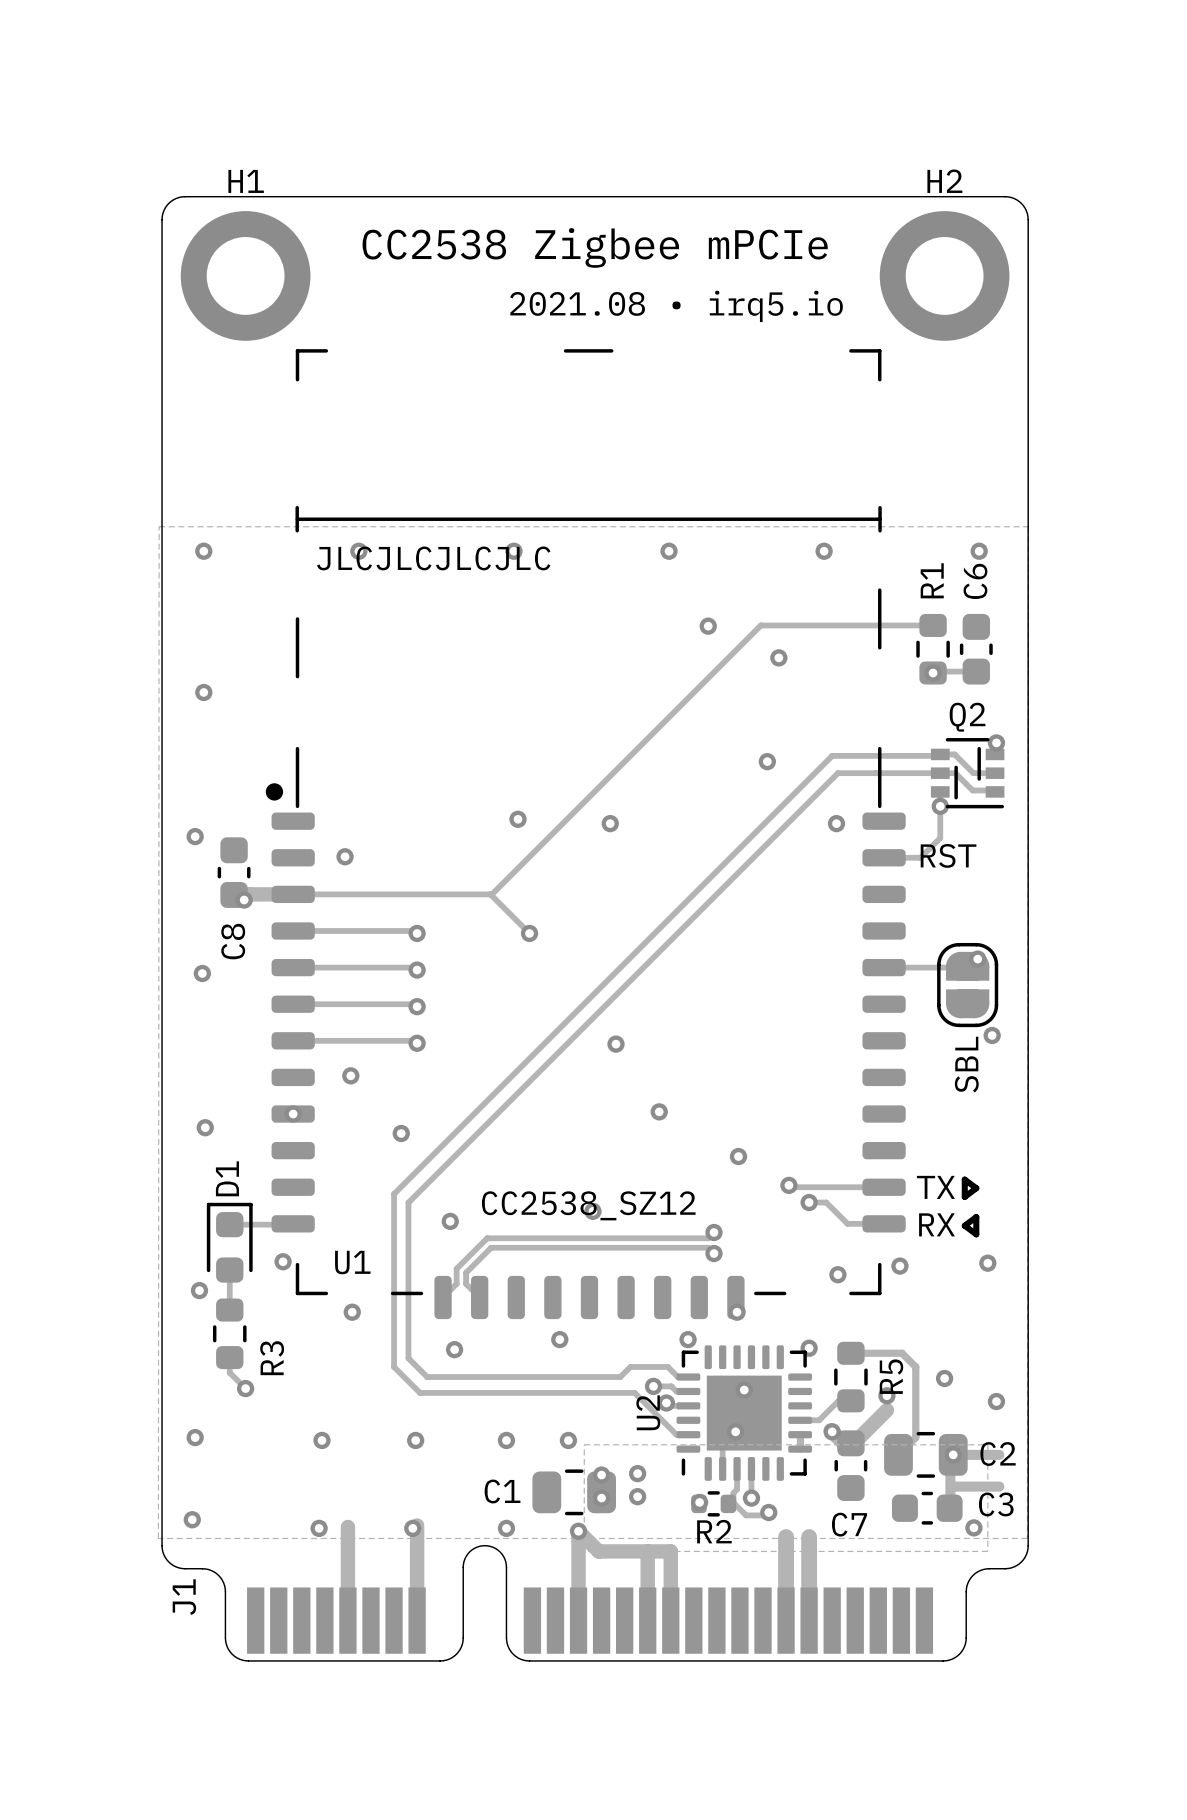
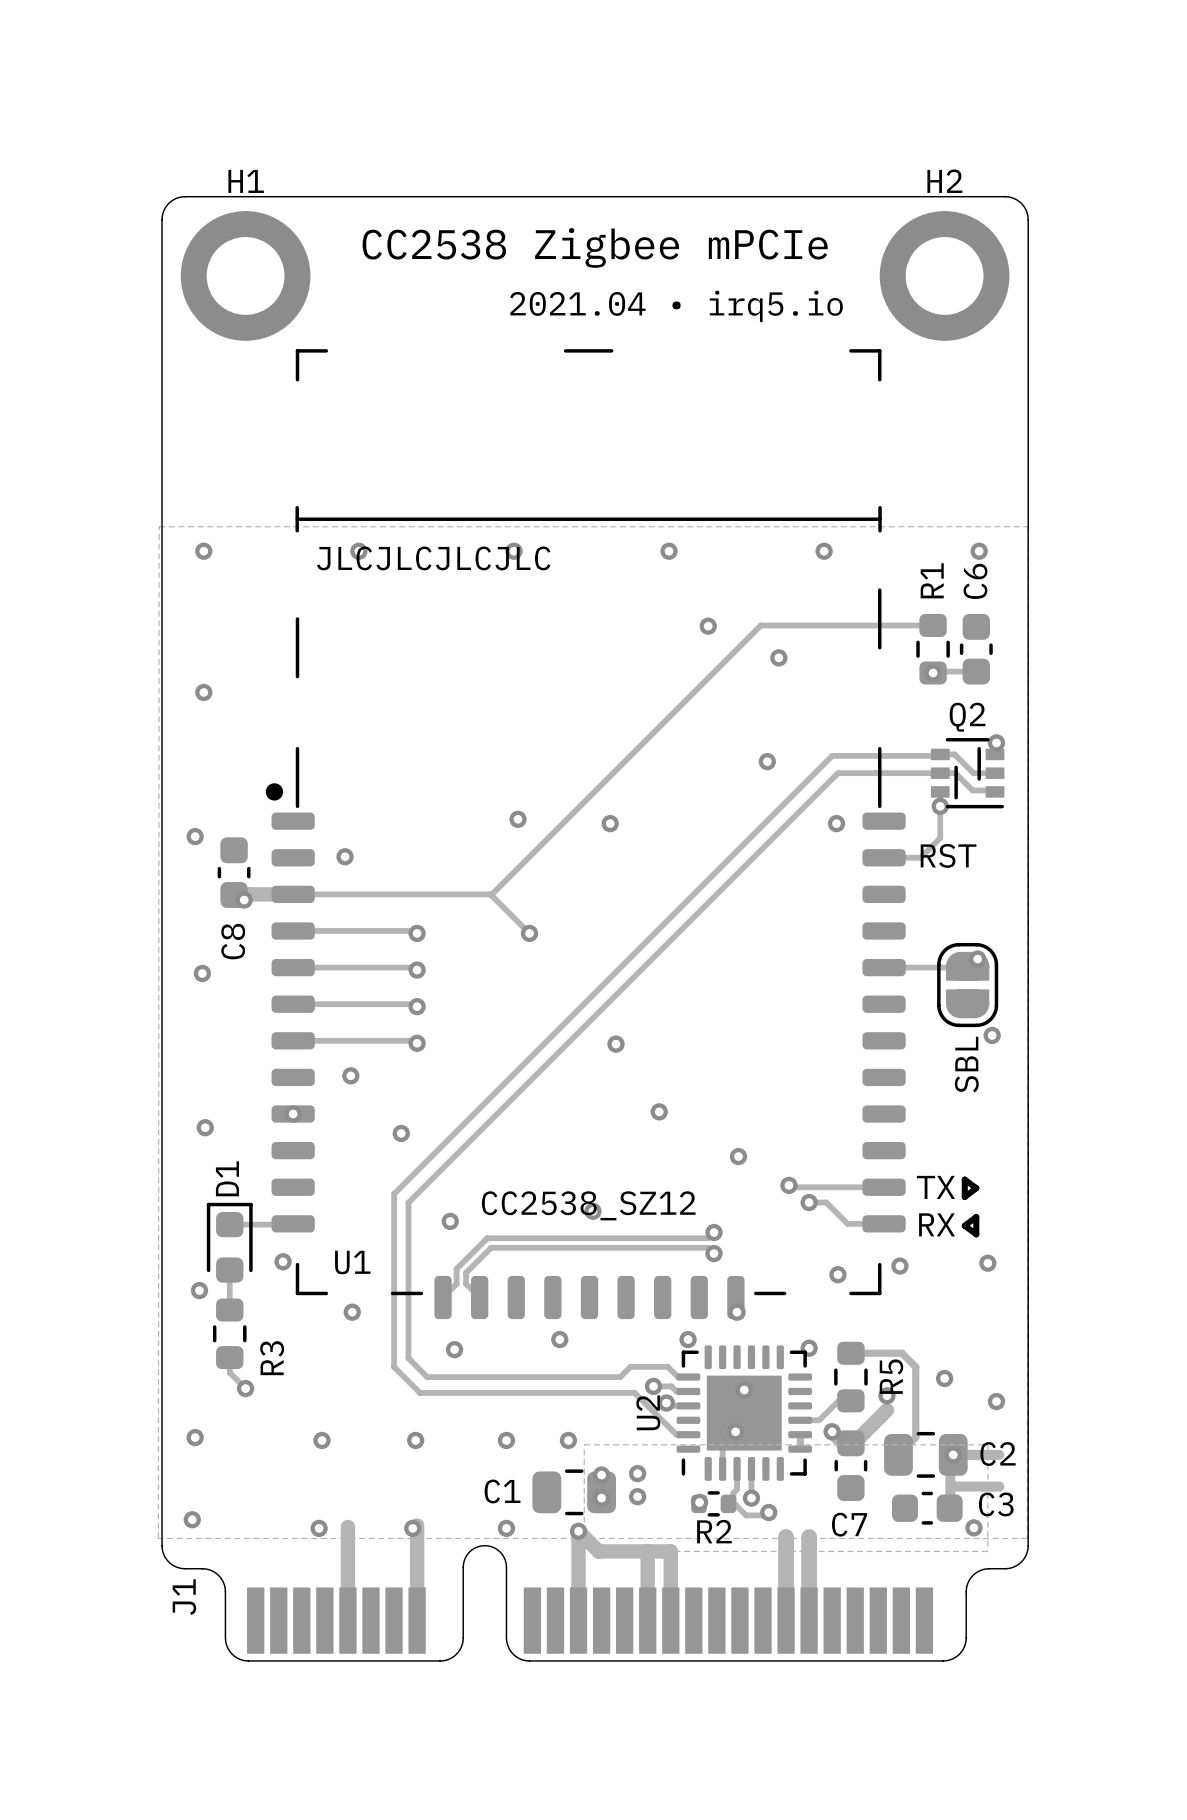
text: 2021.08 • irq5.io (676, 306) -> 2021.04 • irq5.io (676, 306)

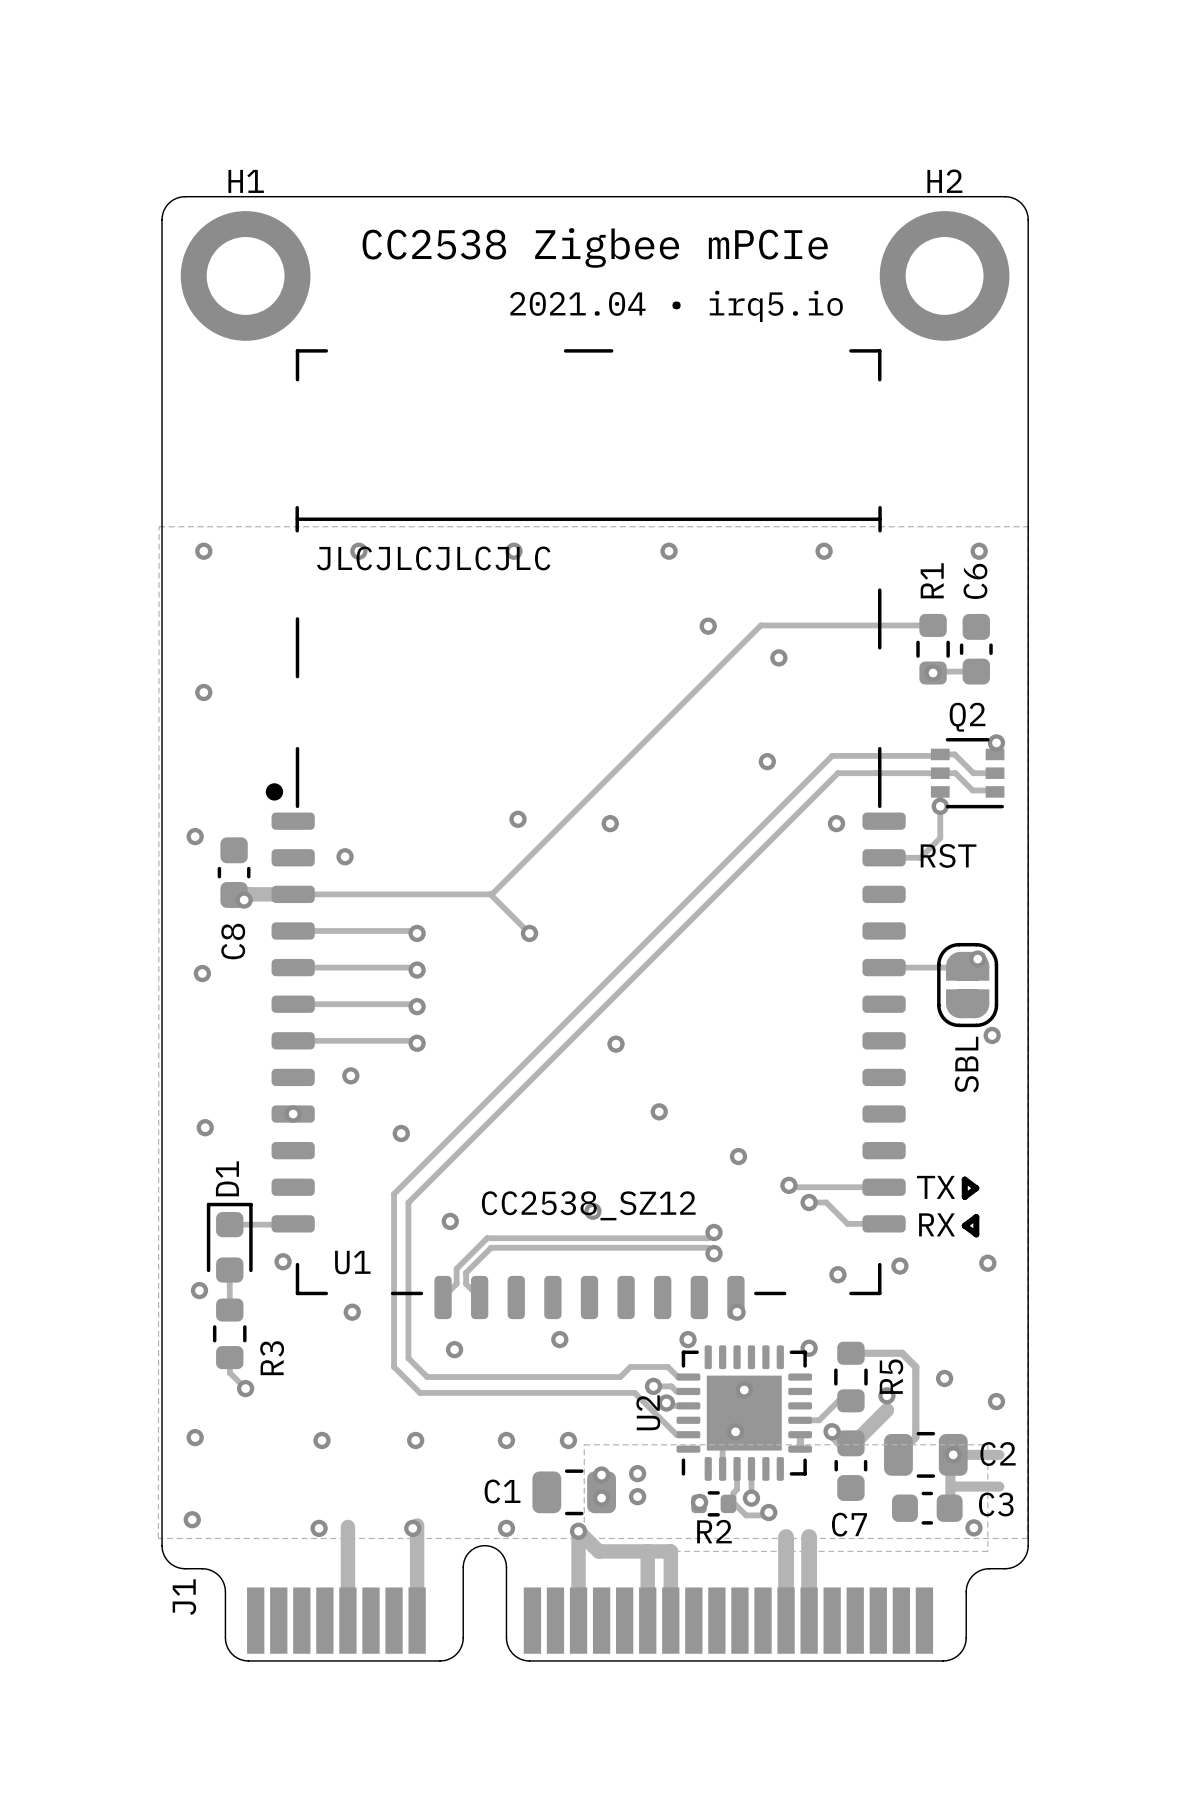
line: (979, 748) (979, 778) -> none
line: (956, 767) (956, 797) -> none

